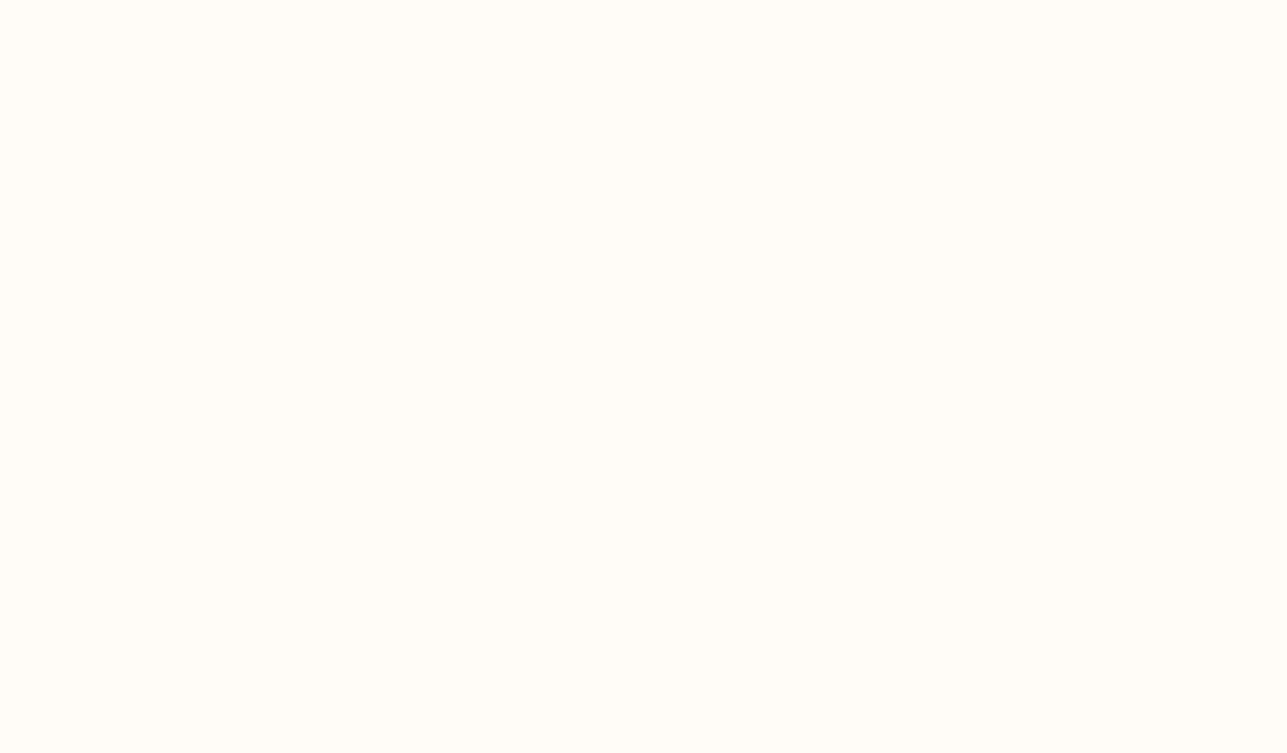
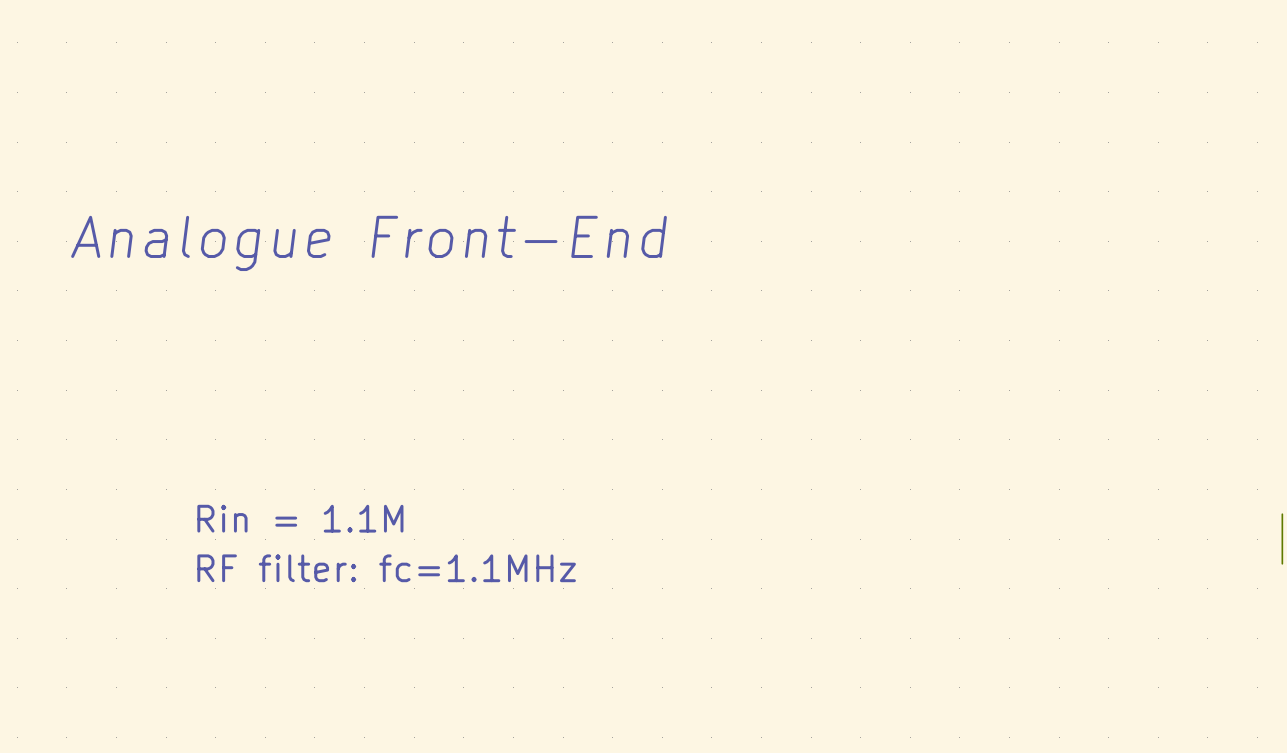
text: none -> Analogue Front-End (369, 243)
wire: none -> (1282, 514) (1282, 563)
text: none -> Rin = 1.1M (300, 518)
text: none -> RF filter: fc=1.1MHz (386, 568)

